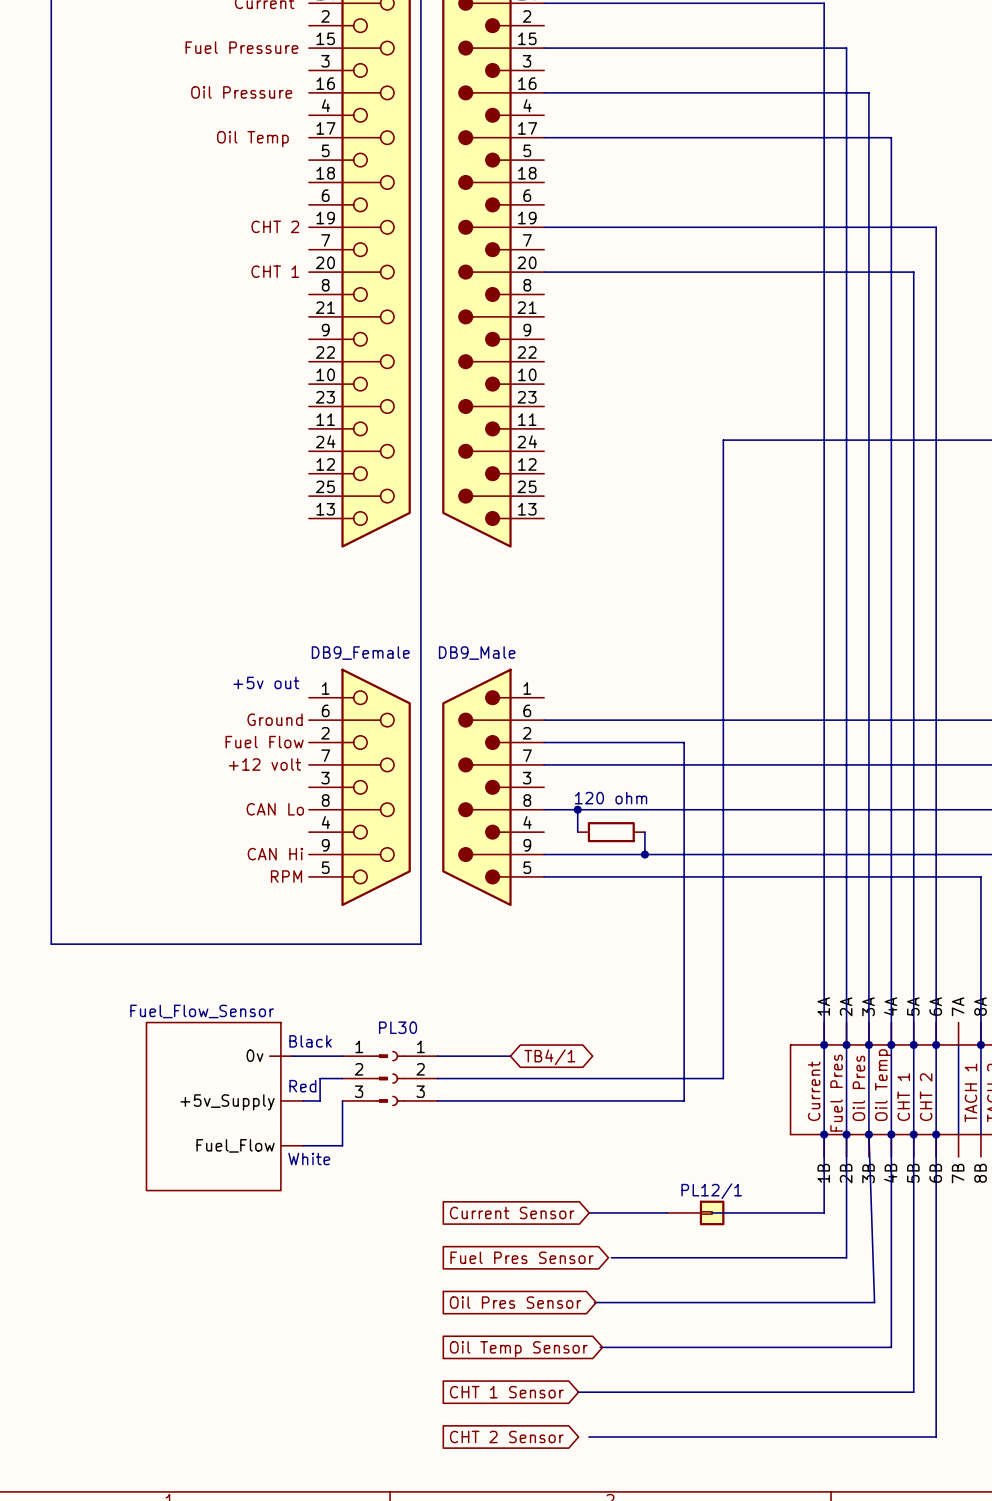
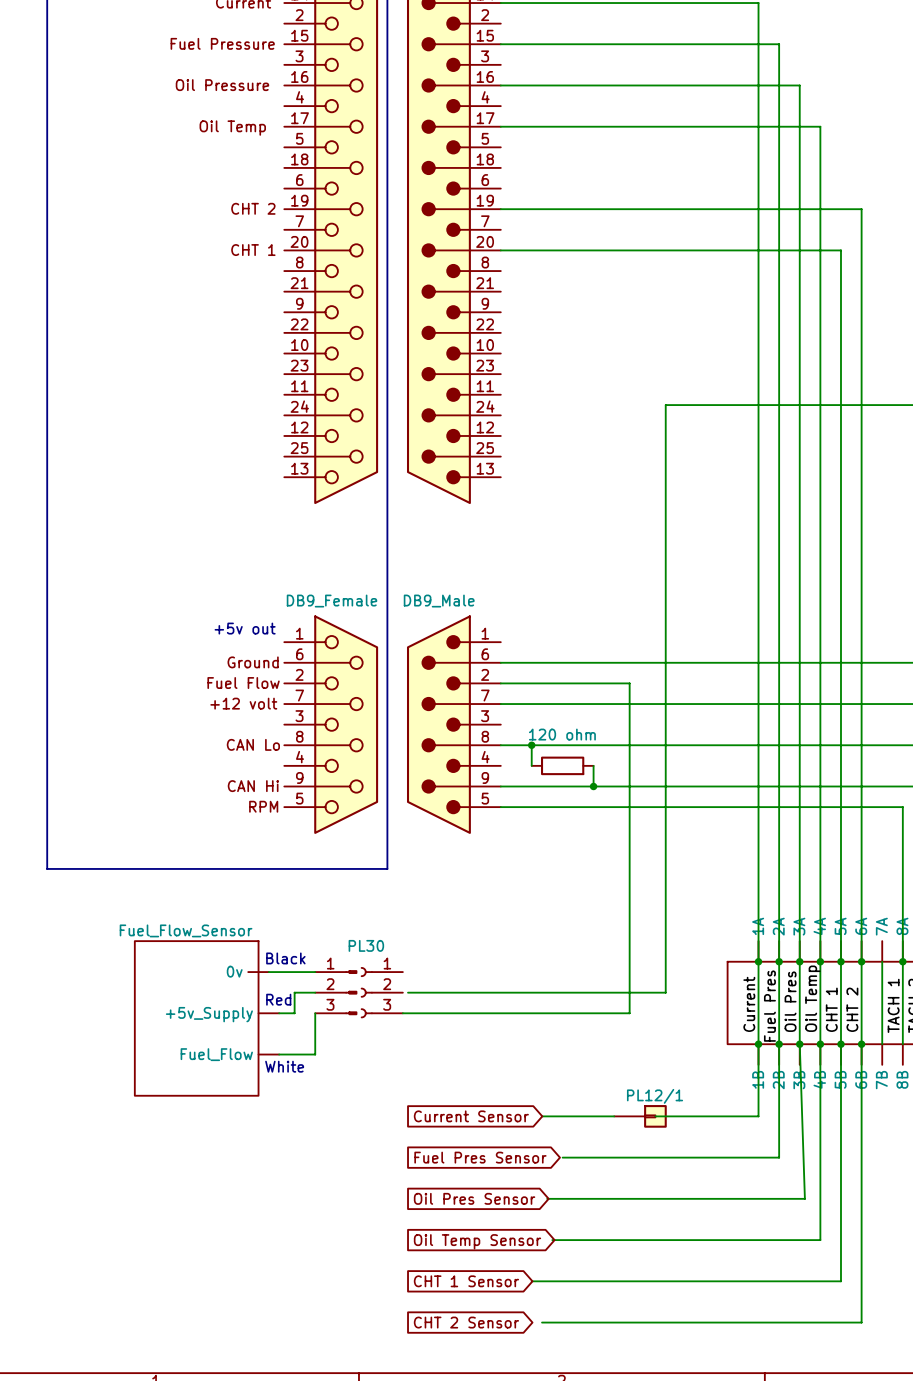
wire: (437, 1056) (510, 1056) -> none
global label: TB4/1 (549, 1057) -> none
wire: (437, 1078) (443, 1078) -> none

